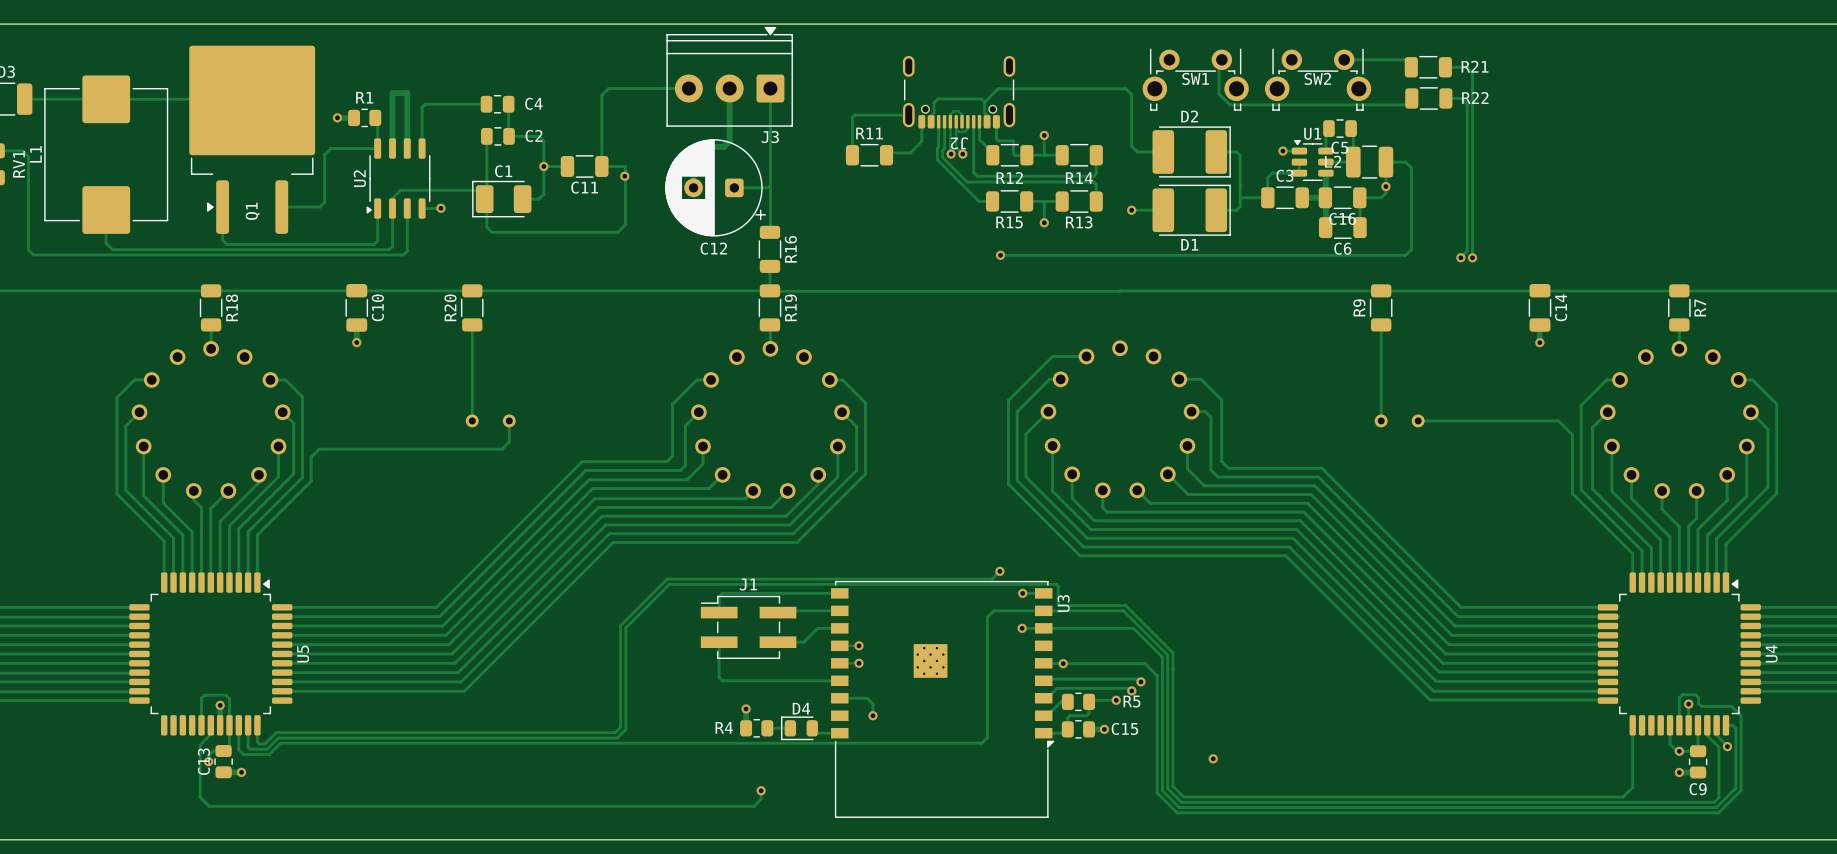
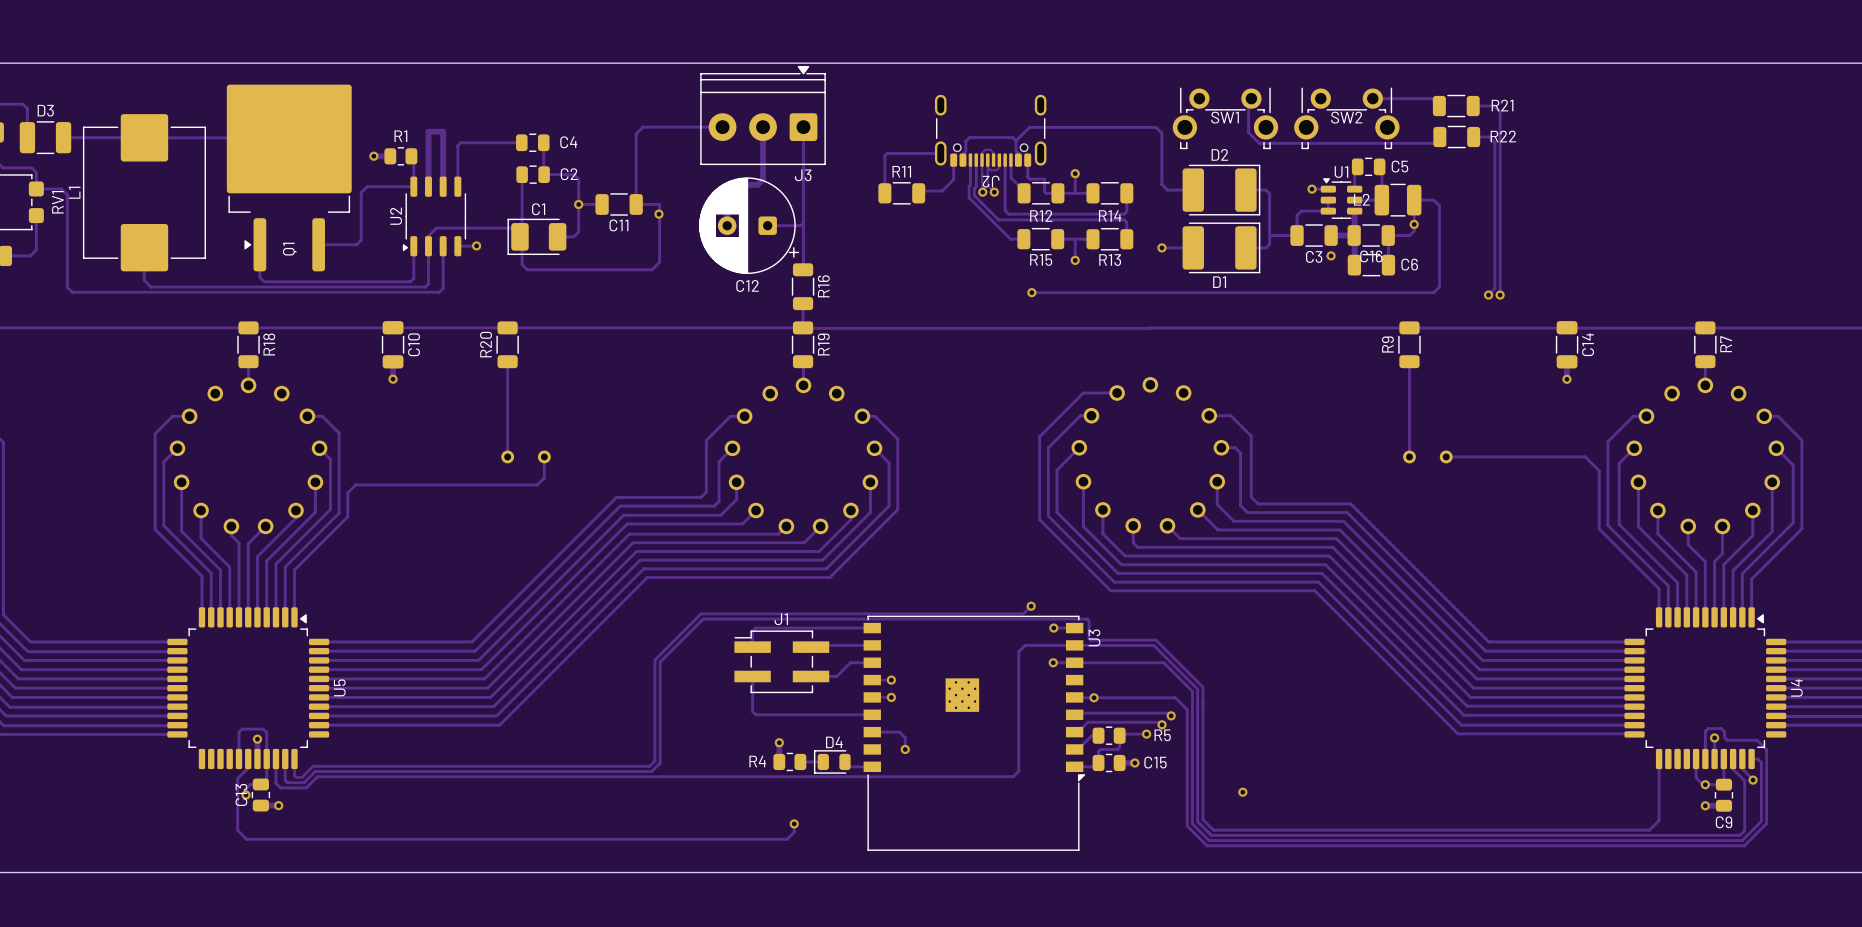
C5 name position: C5 (1339, 147) -> C5 (1399, 166)
C3 name position: C3 (1284, 175) -> C3 (1314, 256)
via: none -> (1331, 255)
C6 name position: C6 (1342, 248) -> C6 (1409, 264)

